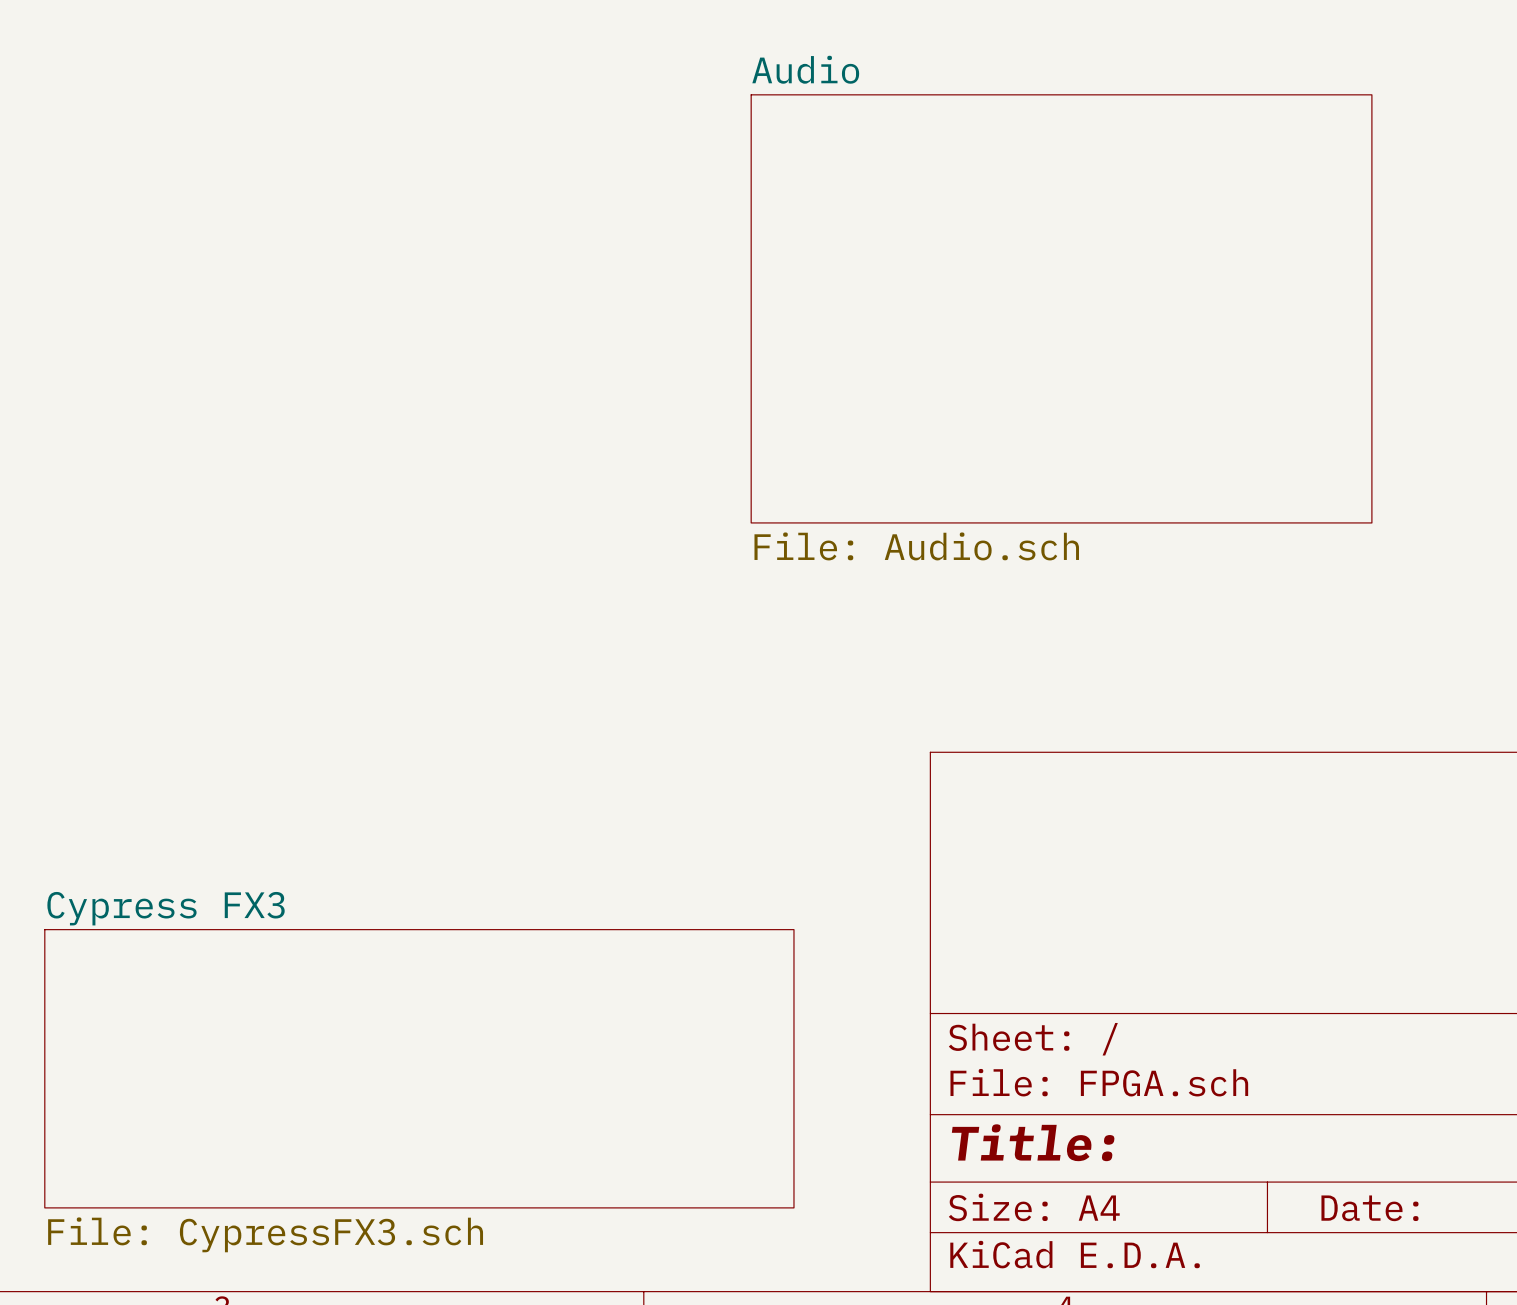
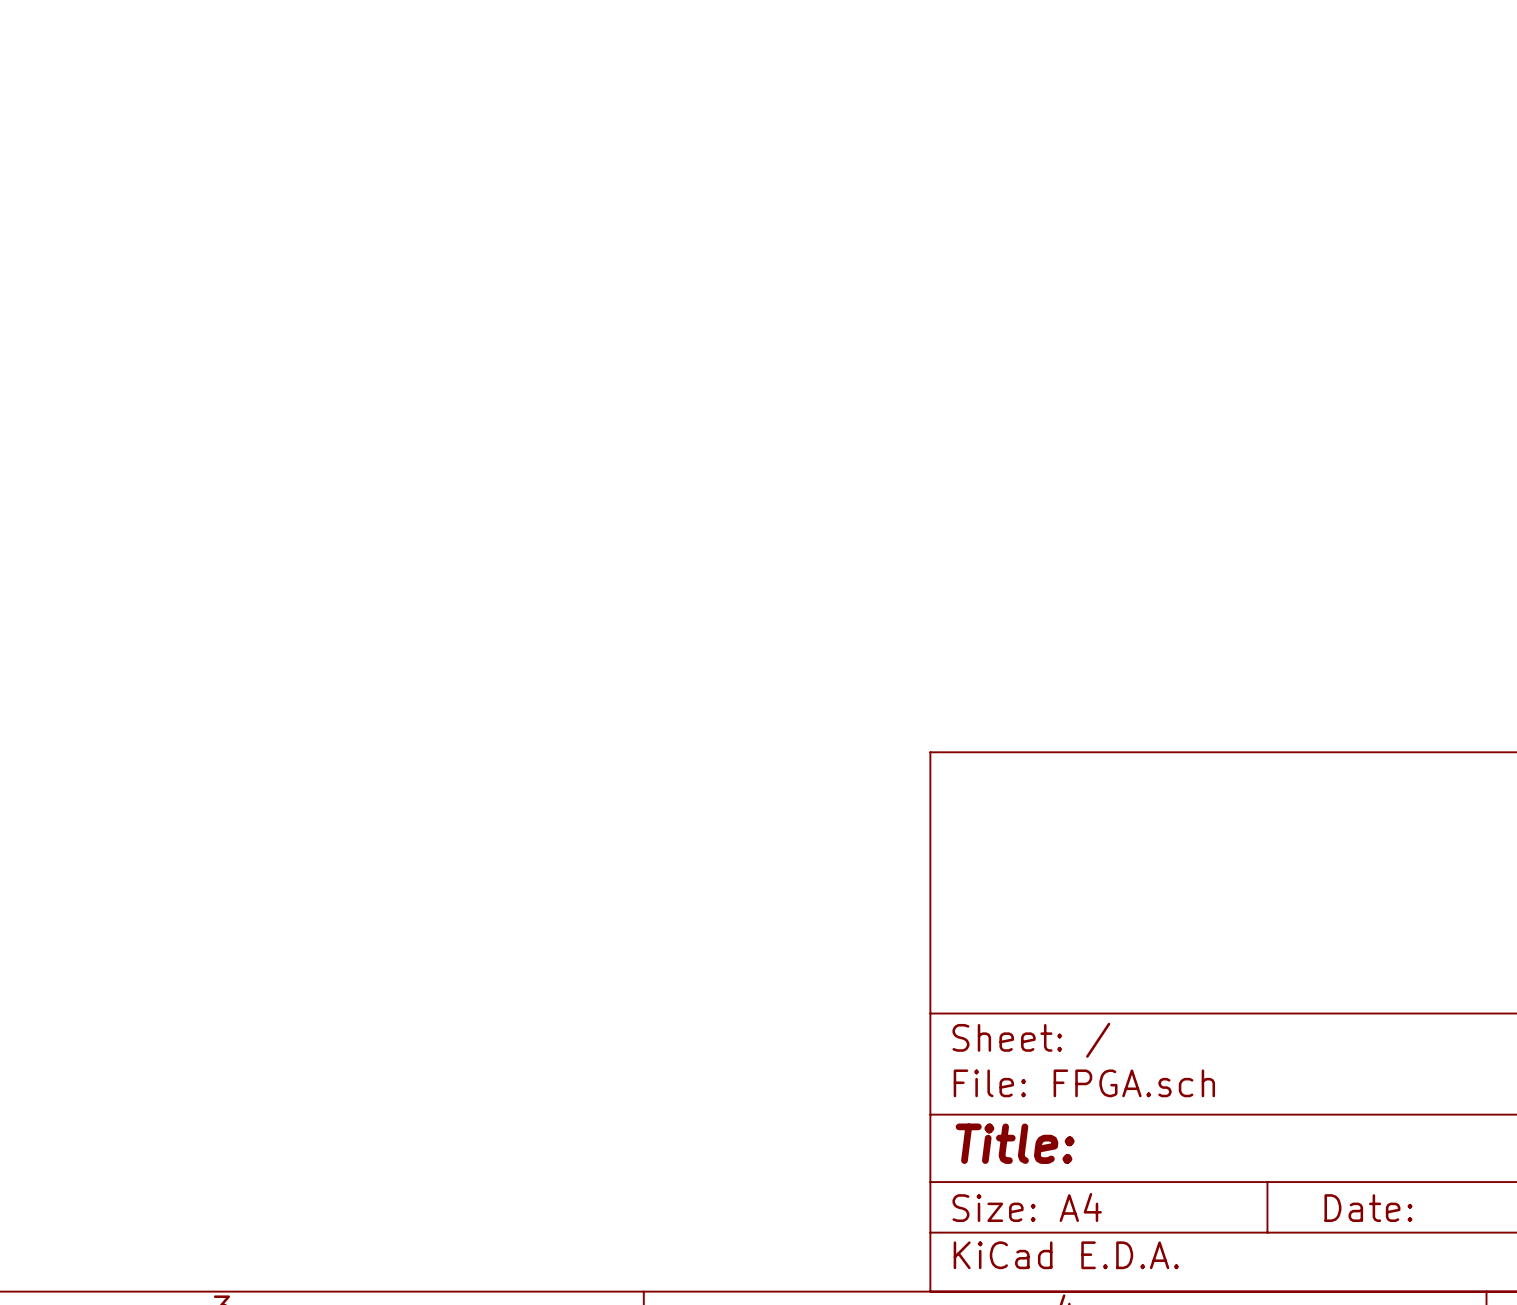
sheet Audio: File: Audio.sch (1061, 308) -> none
sheet Cypress FX3: File: CypressFX3.sch (419, 1068) -> none

